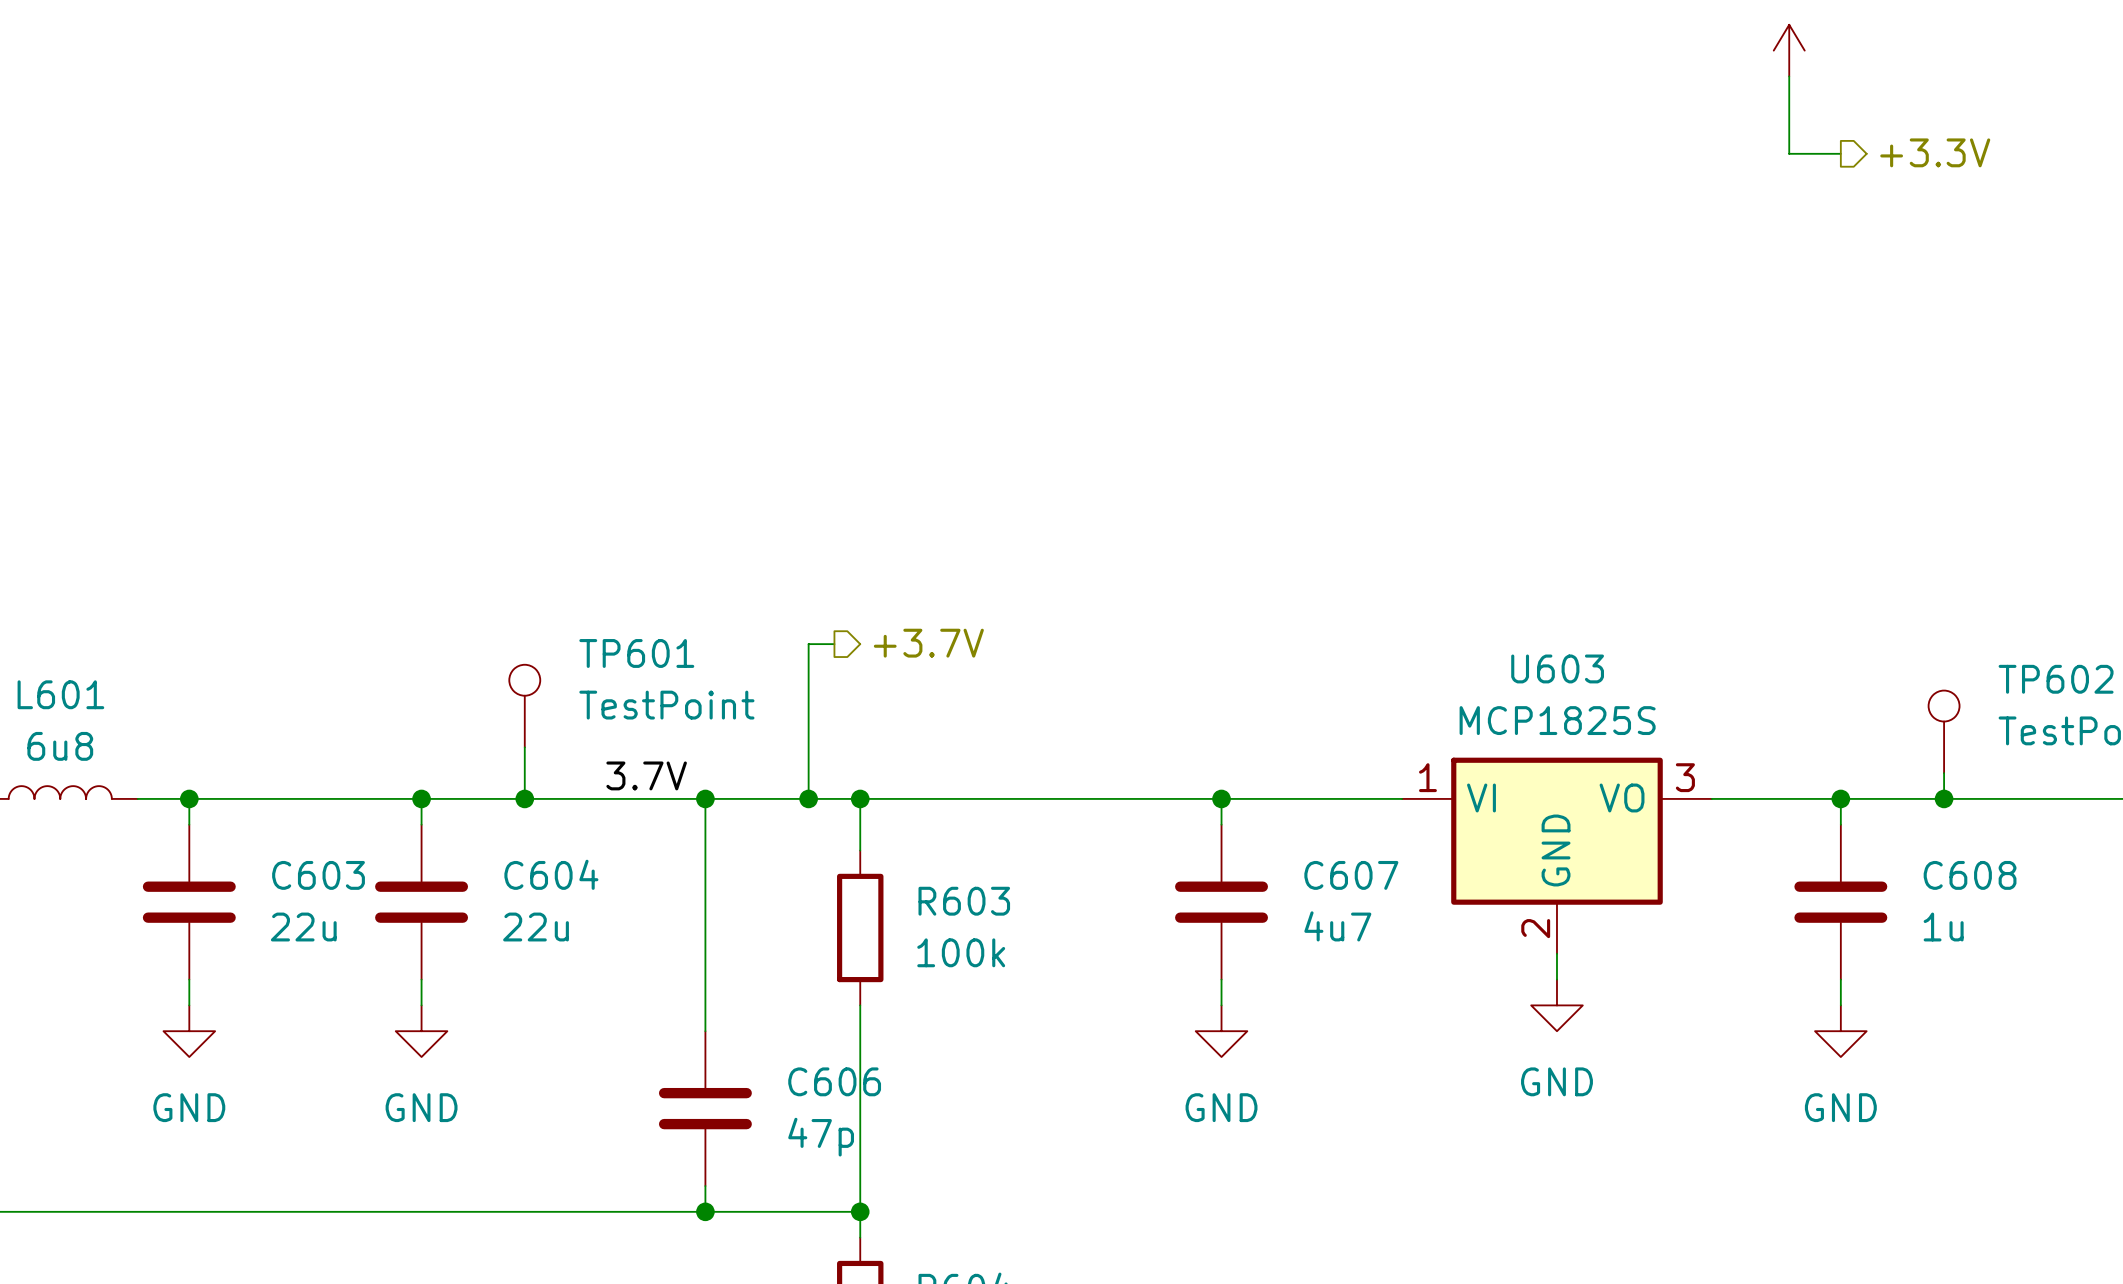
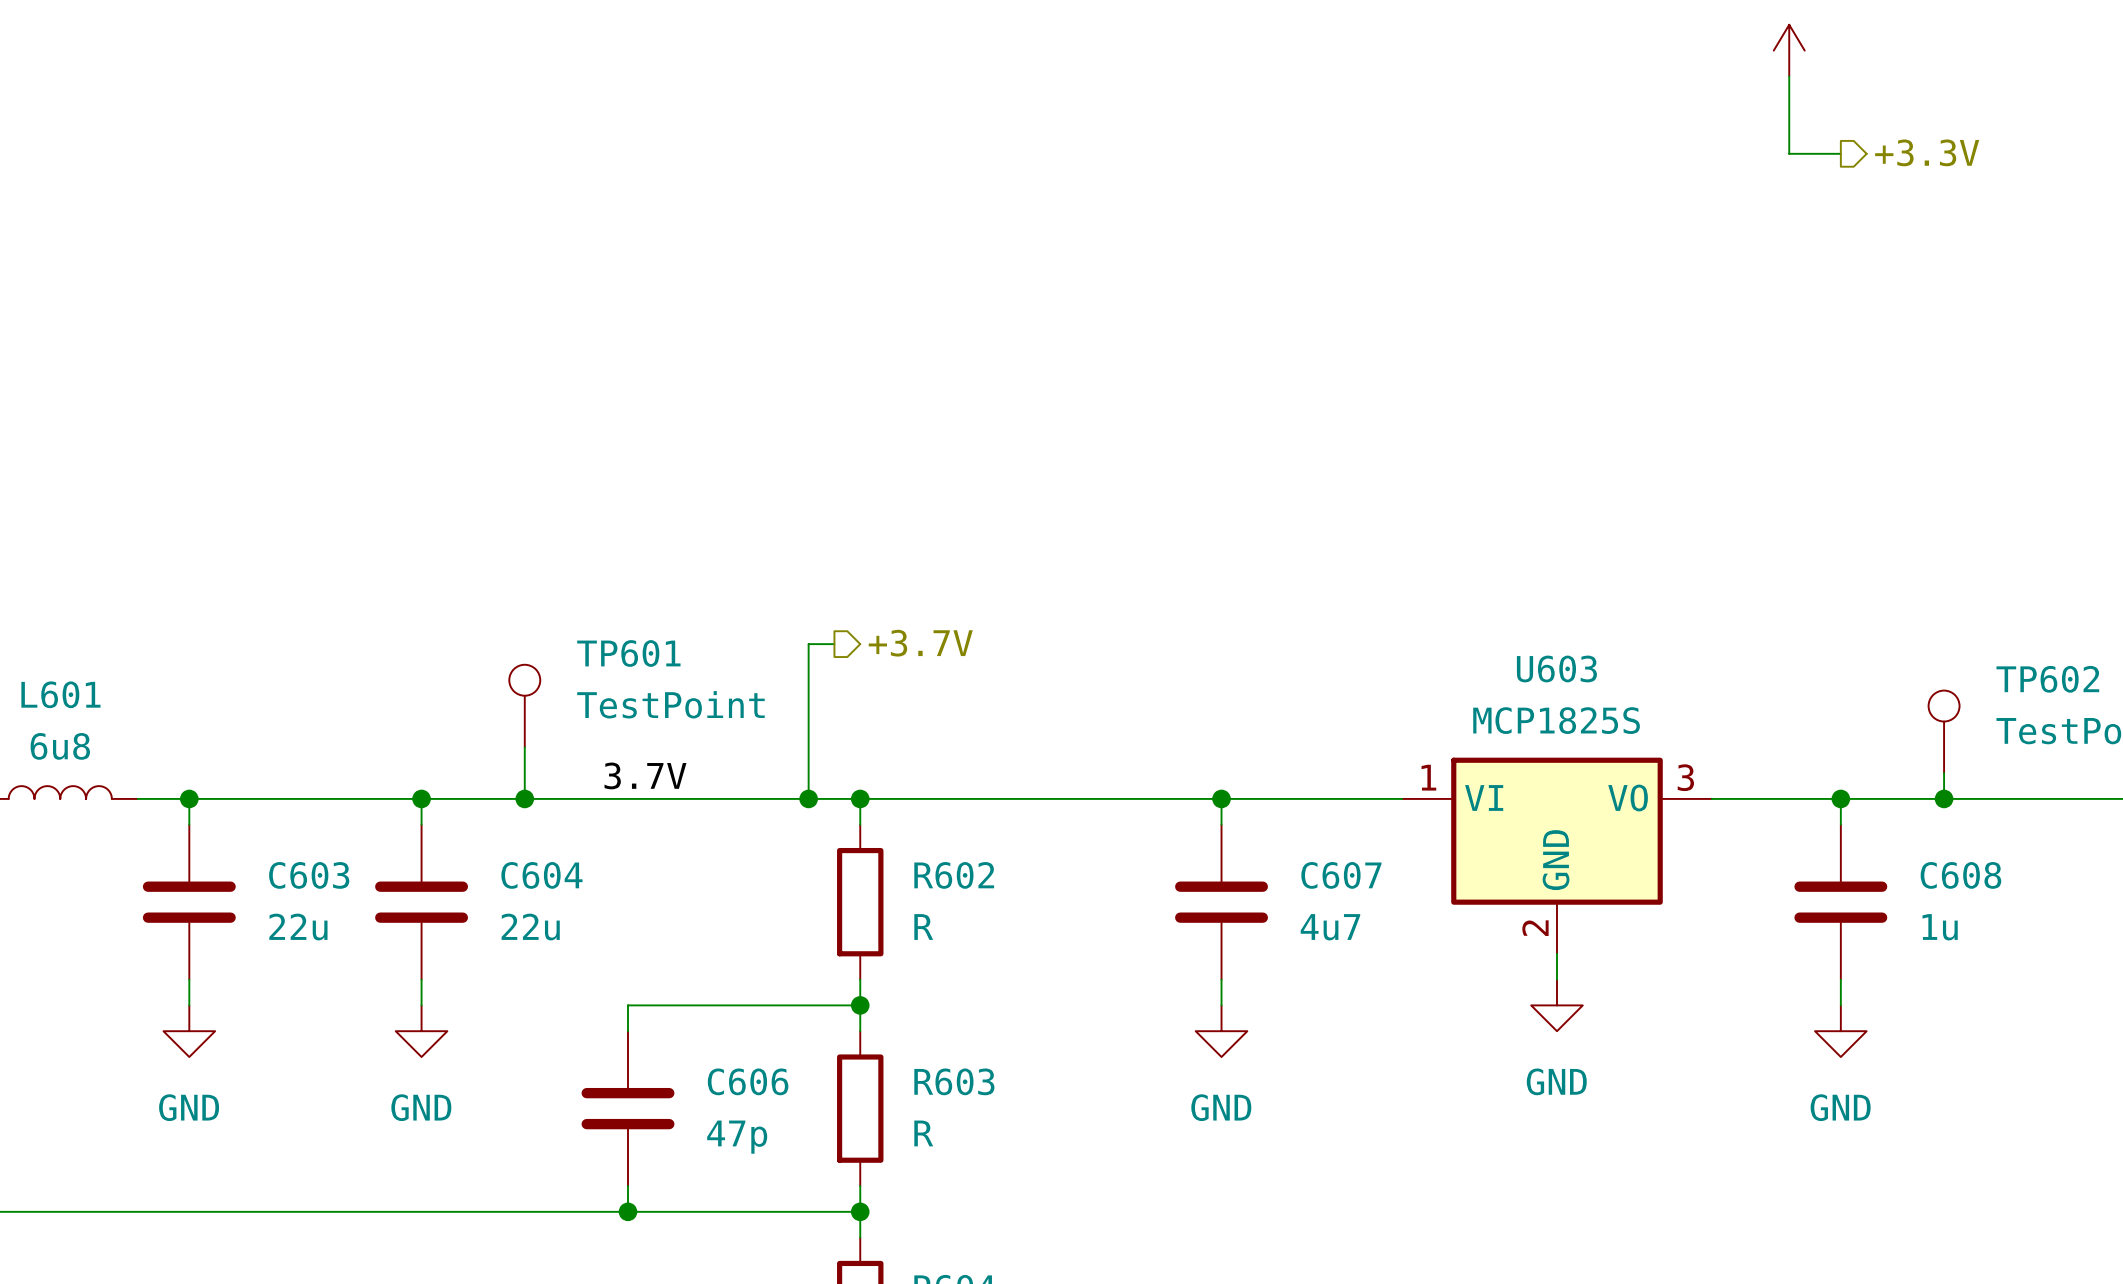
wire: (705, 798) (705, 1031) -> none
junction: (705, 798) -> none
R602: none -> R (860, 902)
R603 position: (860, 927) -> (860, 1108)
R603 value: 100k (961, 952) -> R (923, 1133)
wire: none -> (860, 979) (860, 1005) (628, 1005) (628, 1031)
junction: none -> (860, 1005)
wire: (860, 1031) (860, 1186) -> none
C606 position: (705, 1108) -> (628, 1108)
wire: (705, 1186) (705, 1211) -> (628, 1186) (628, 1211)
junction position: (705, 1211) -> (628, 1211)

